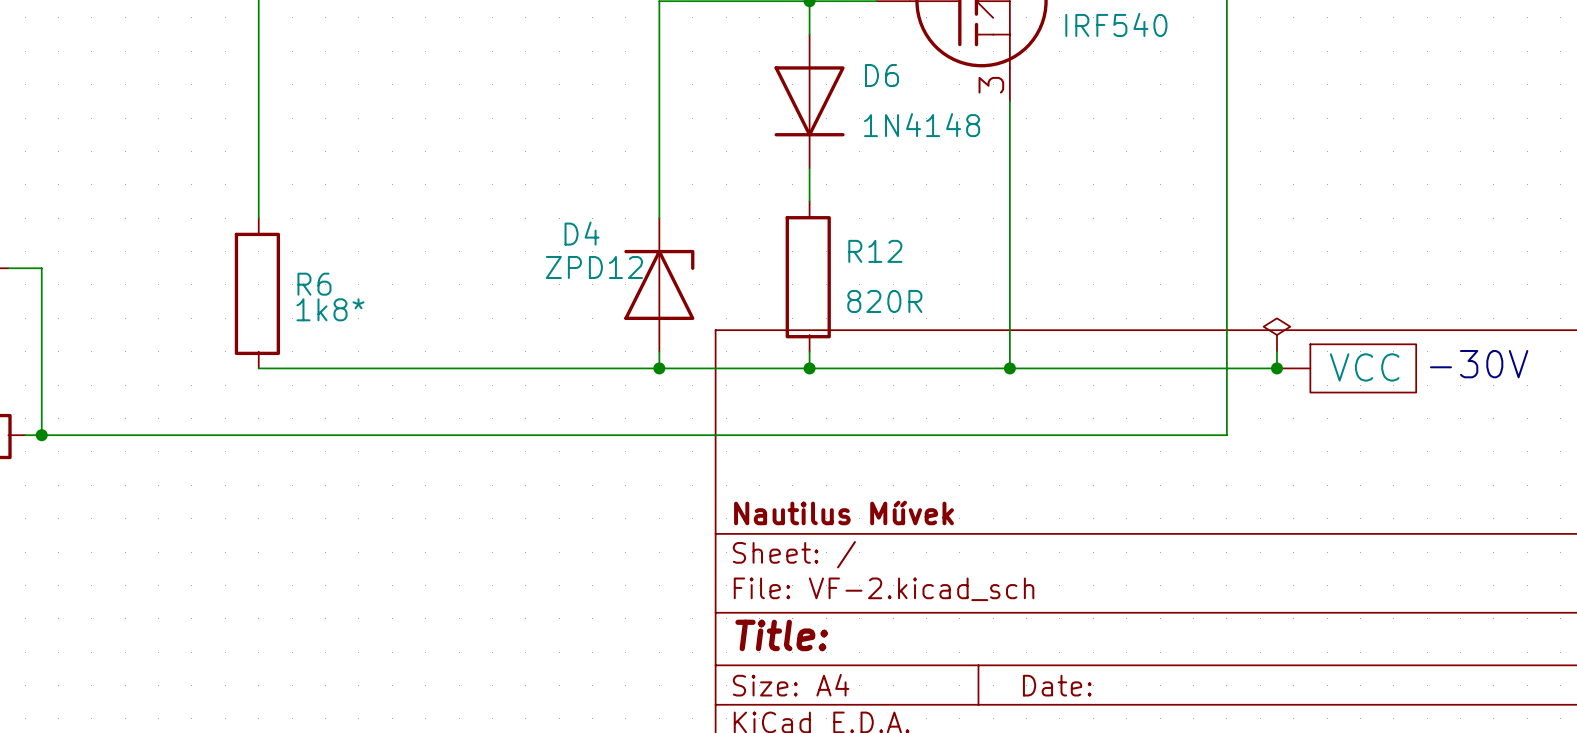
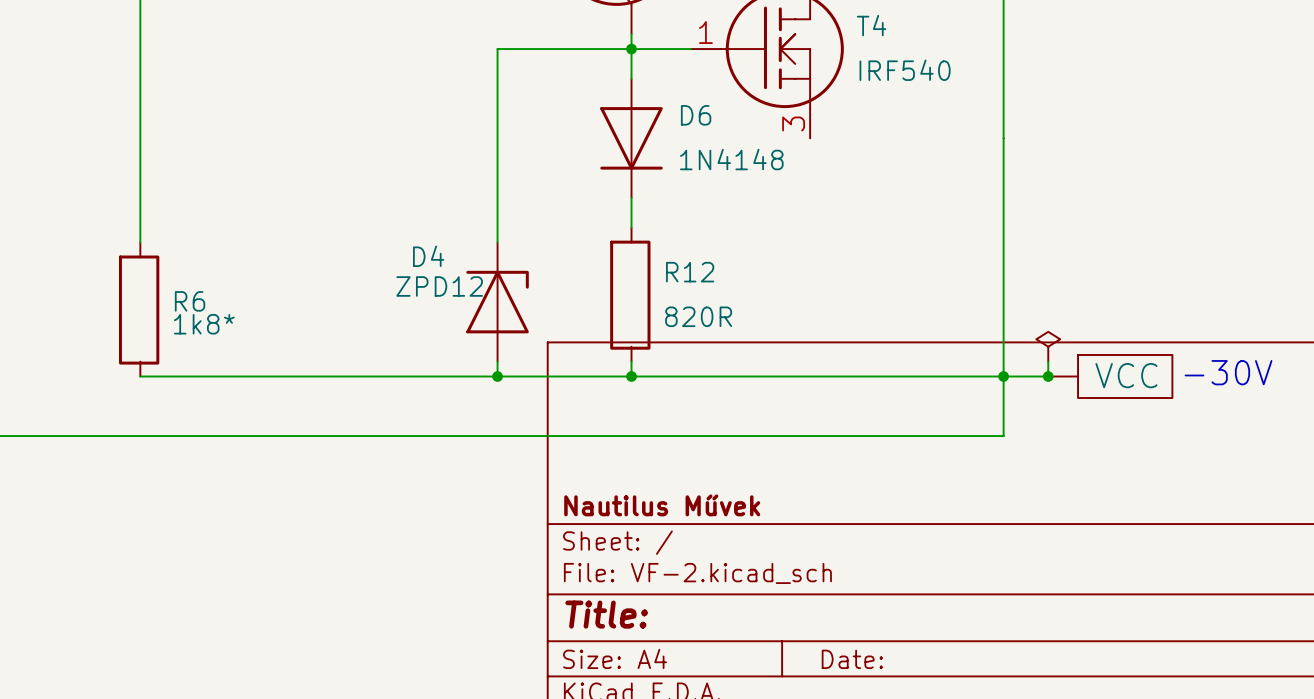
wire: (1009, 101) (1009, 368) -> none
junction: (1009, 368) -> none
junction: none -> (1003, 376)

